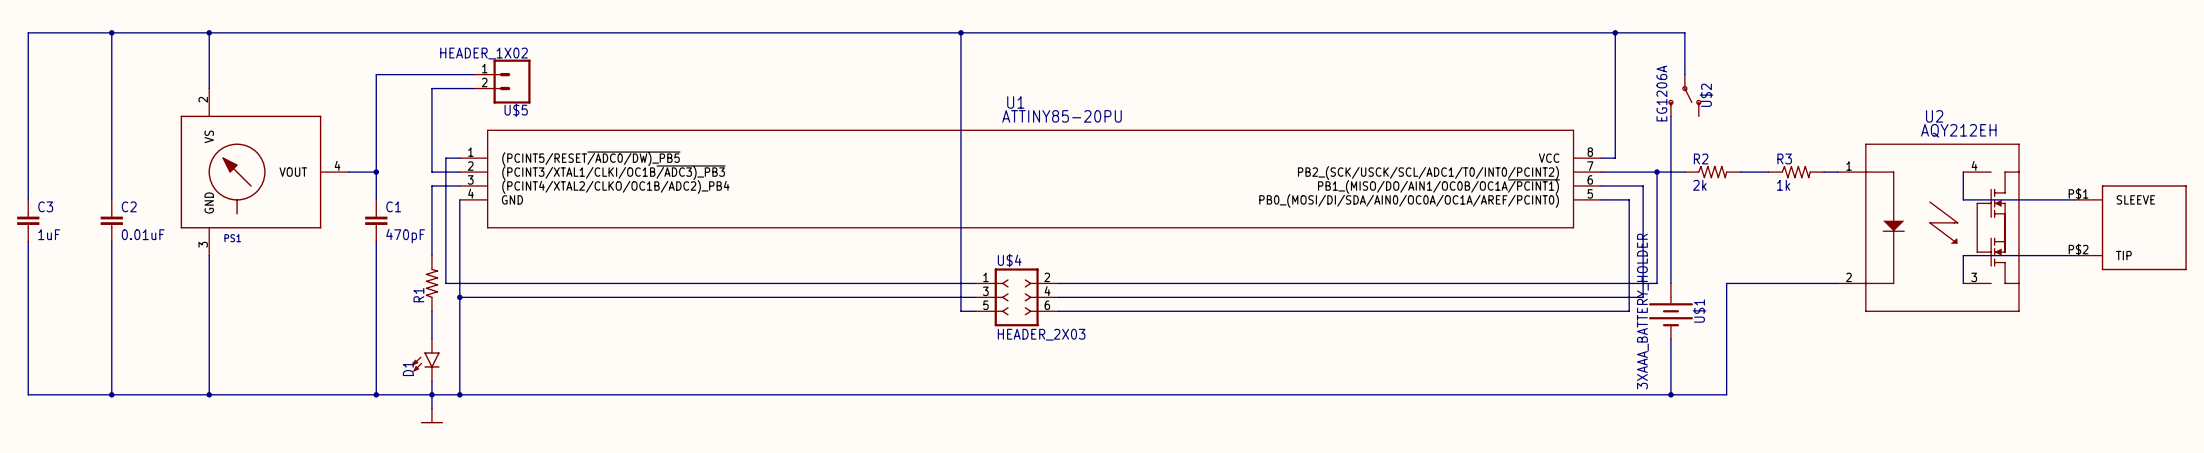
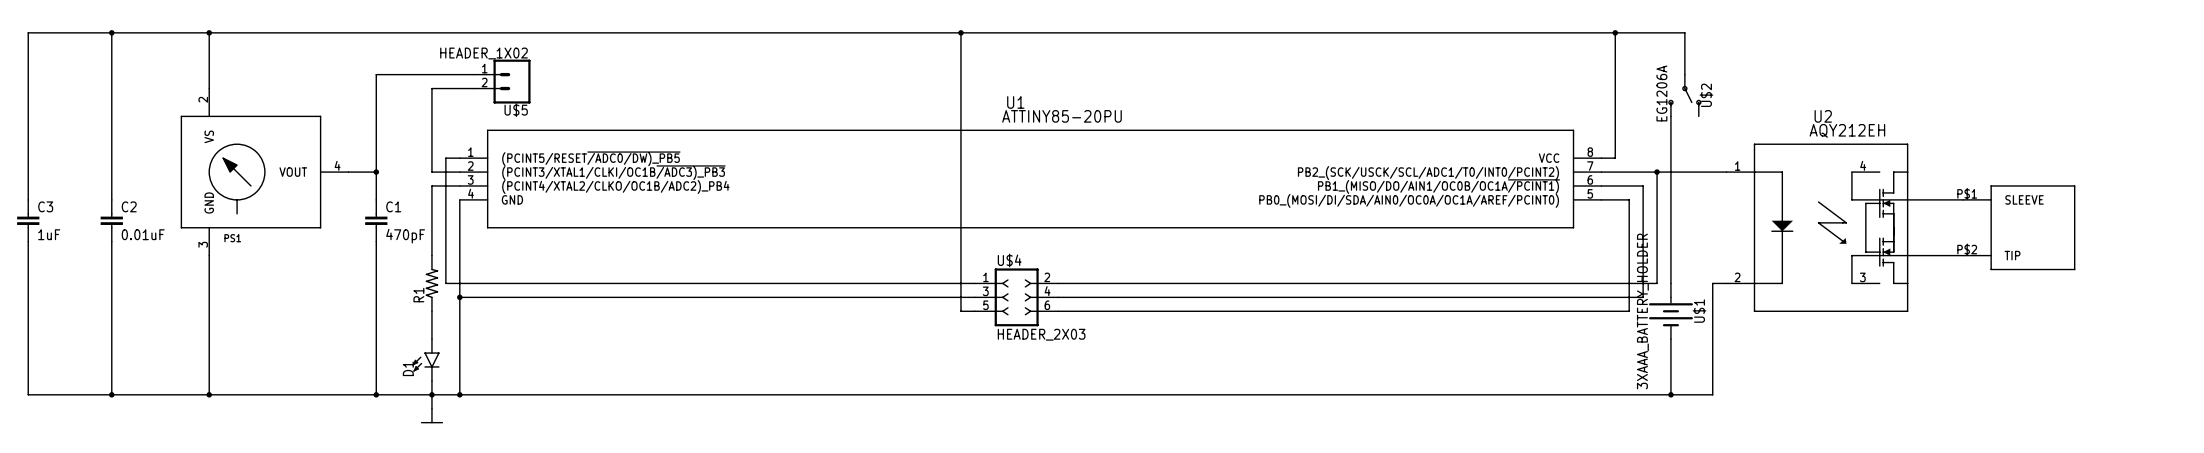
R2: 2k (1712, 172) -> none
R3: 1k (1796, 172) -> none
wire: (1824, 172) (1838, 172) -> none
wire: (1963, 172) (1963, 199) (2074, 199) -> (1851, 172) (1851, 199) (1963, 199)
U2 position: (1928, 227) -> (1817, 227)
part position: (2130, 227) -> (2019, 227)
wire: (2074, 255) (1963, 255) (1963, 283) -> (1963, 255) (1851, 255) (1851, 283)
wire: (1838, 283) (1726, 283) (1726, 394) (1712, 394) -> (1726, 283) (1712, 283) (1712, 394)

